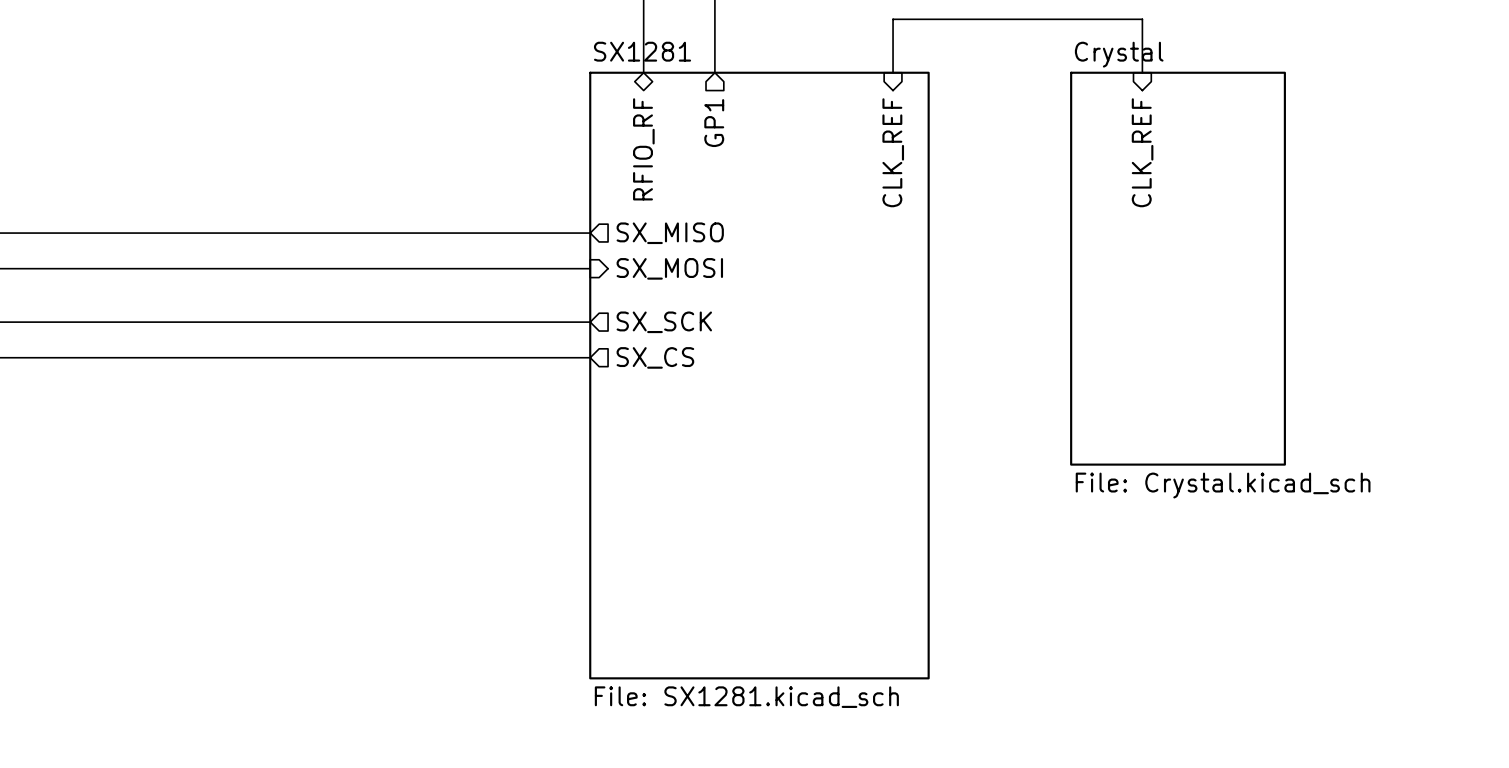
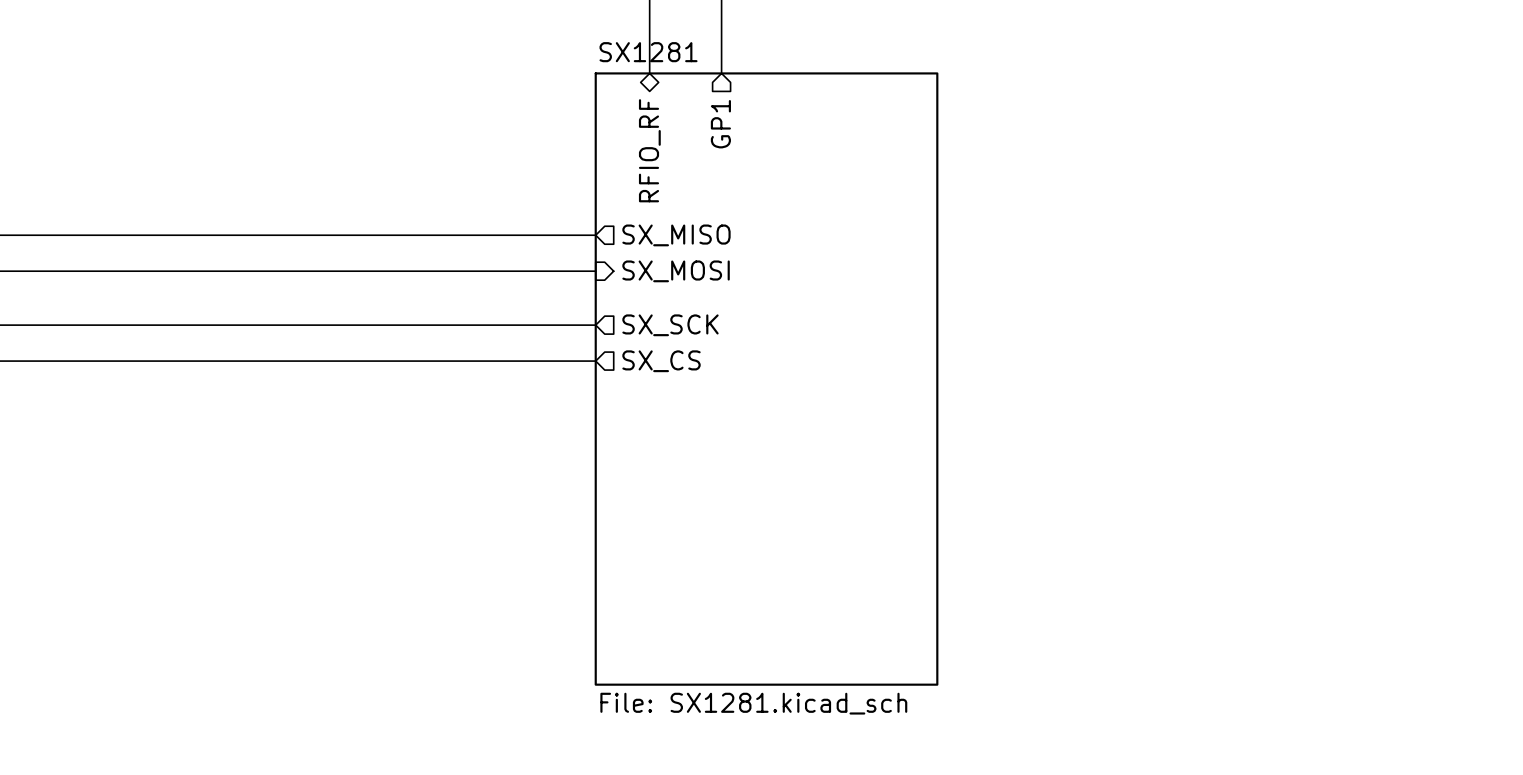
wire: (893, 72) (893, 19) (1142, 19) (1142, 72) -> none
hierarchical label: CLK_REF (893, 152) -> none
hierarchical label: CLK_REF (1142, 152) -> none
sheet Crystal: File: Crystal.kicad_sch (1178, 268) -> none

